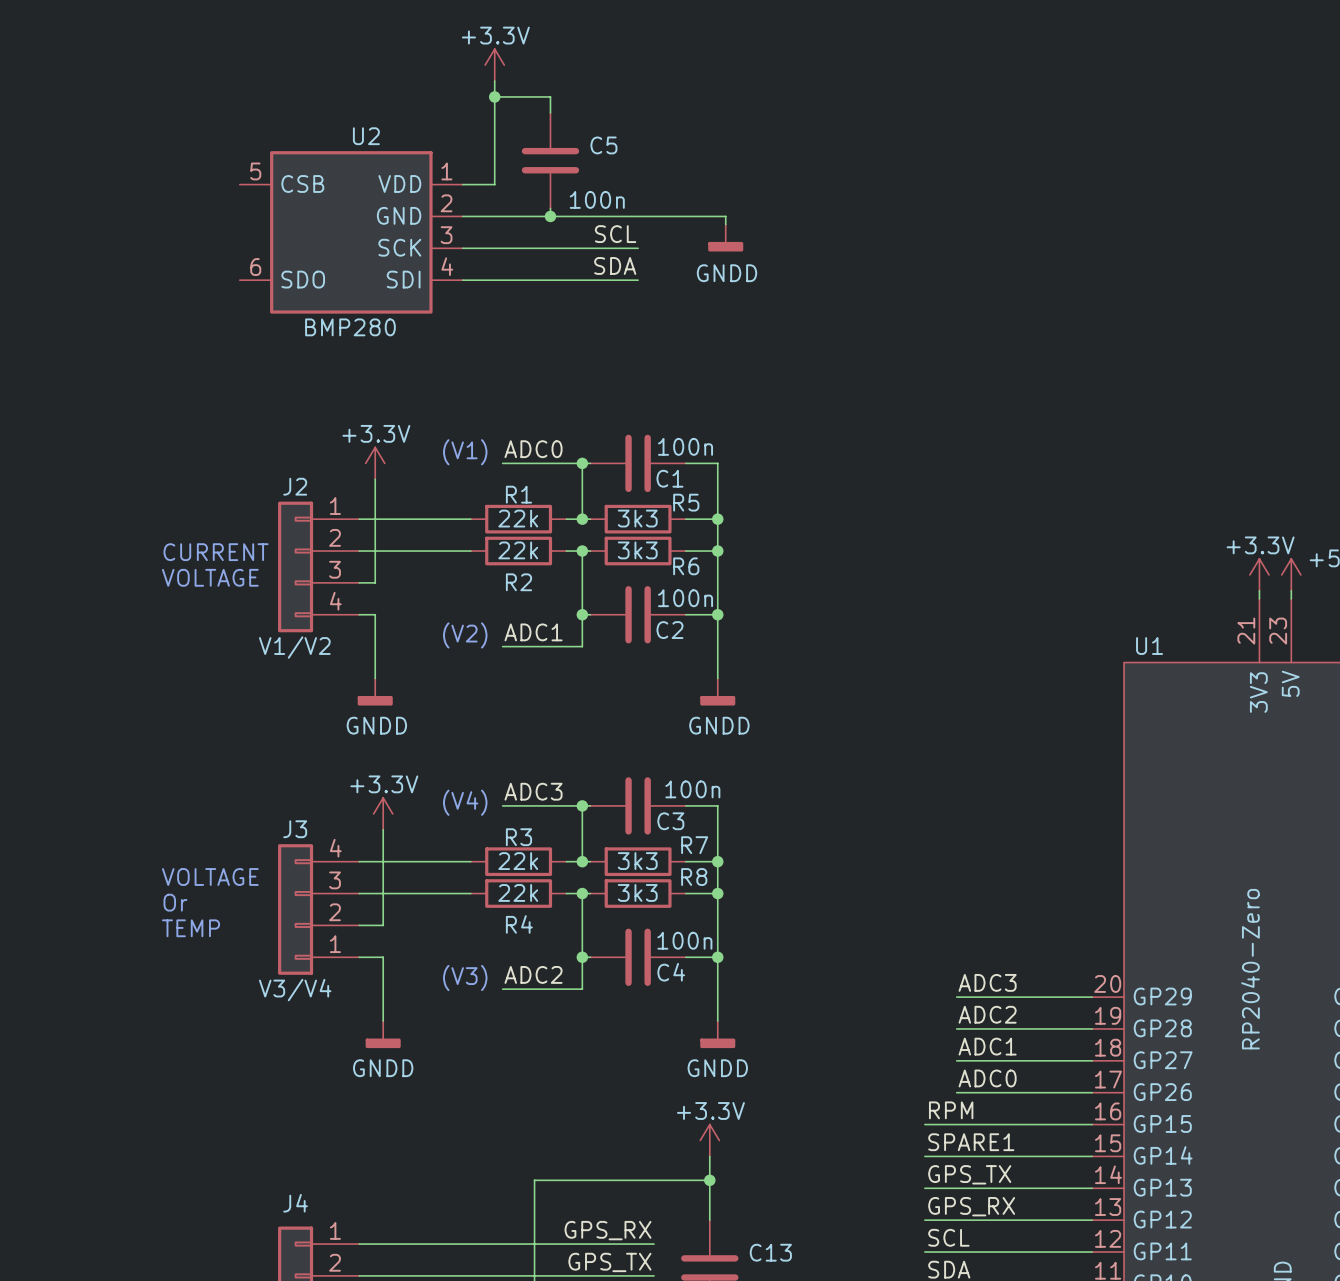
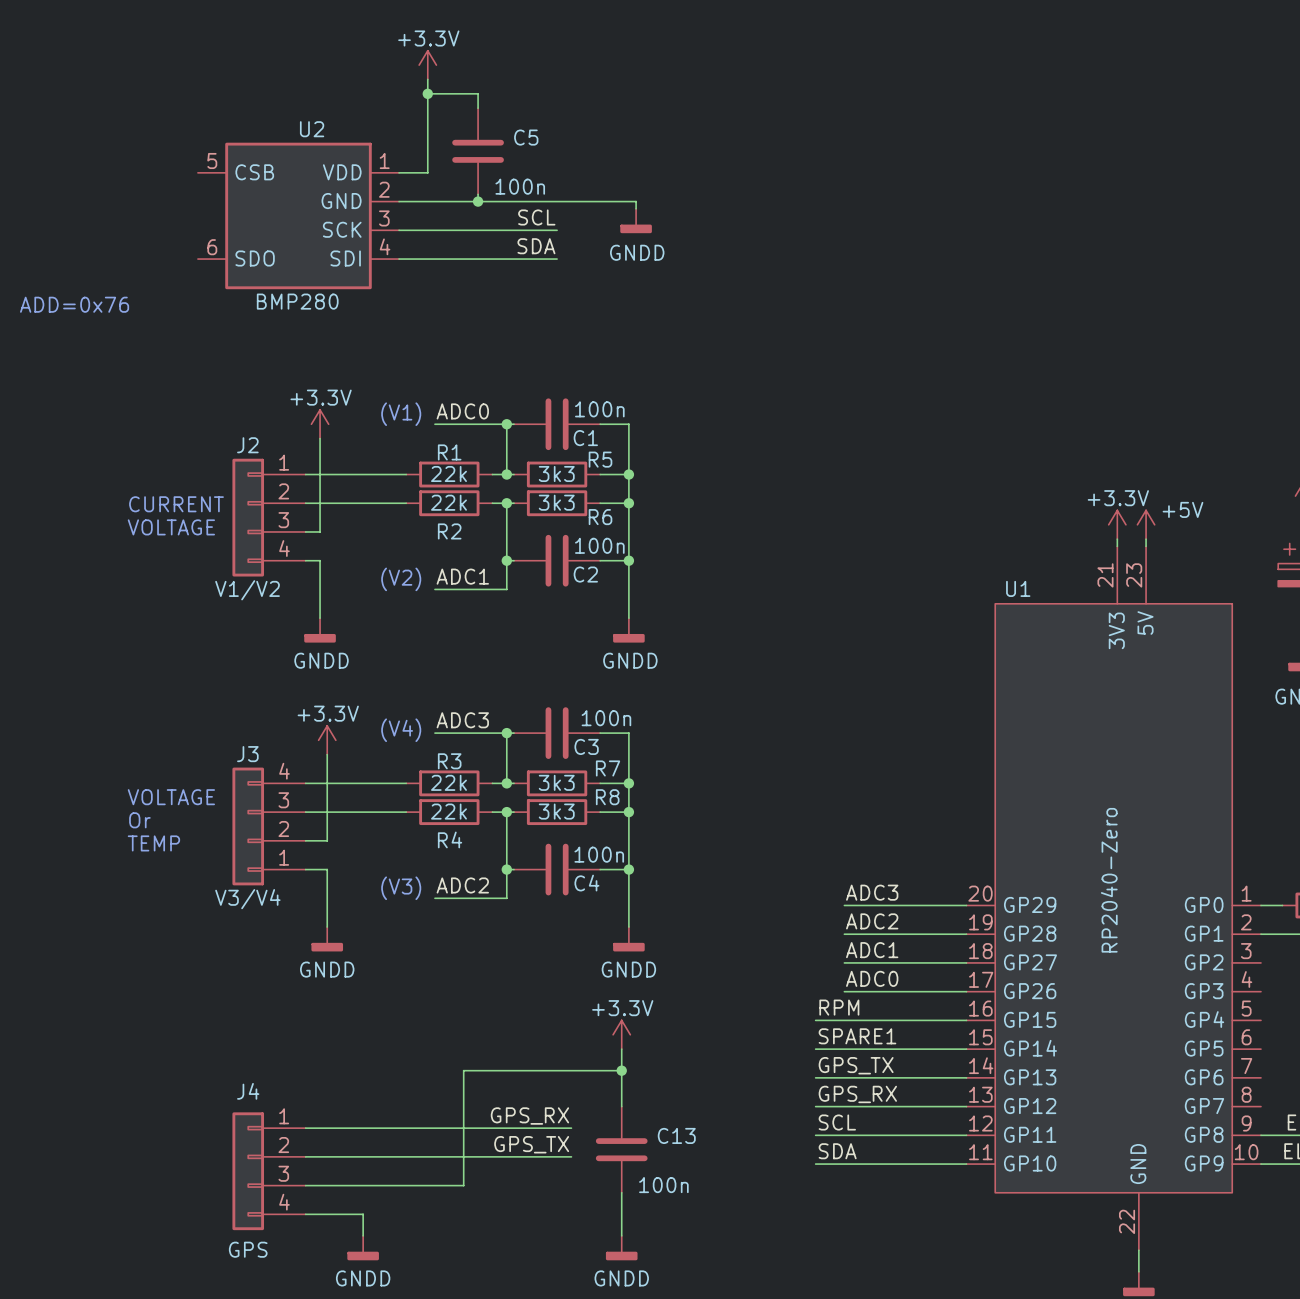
text: none -> ADD=0x76 (74, 304)

